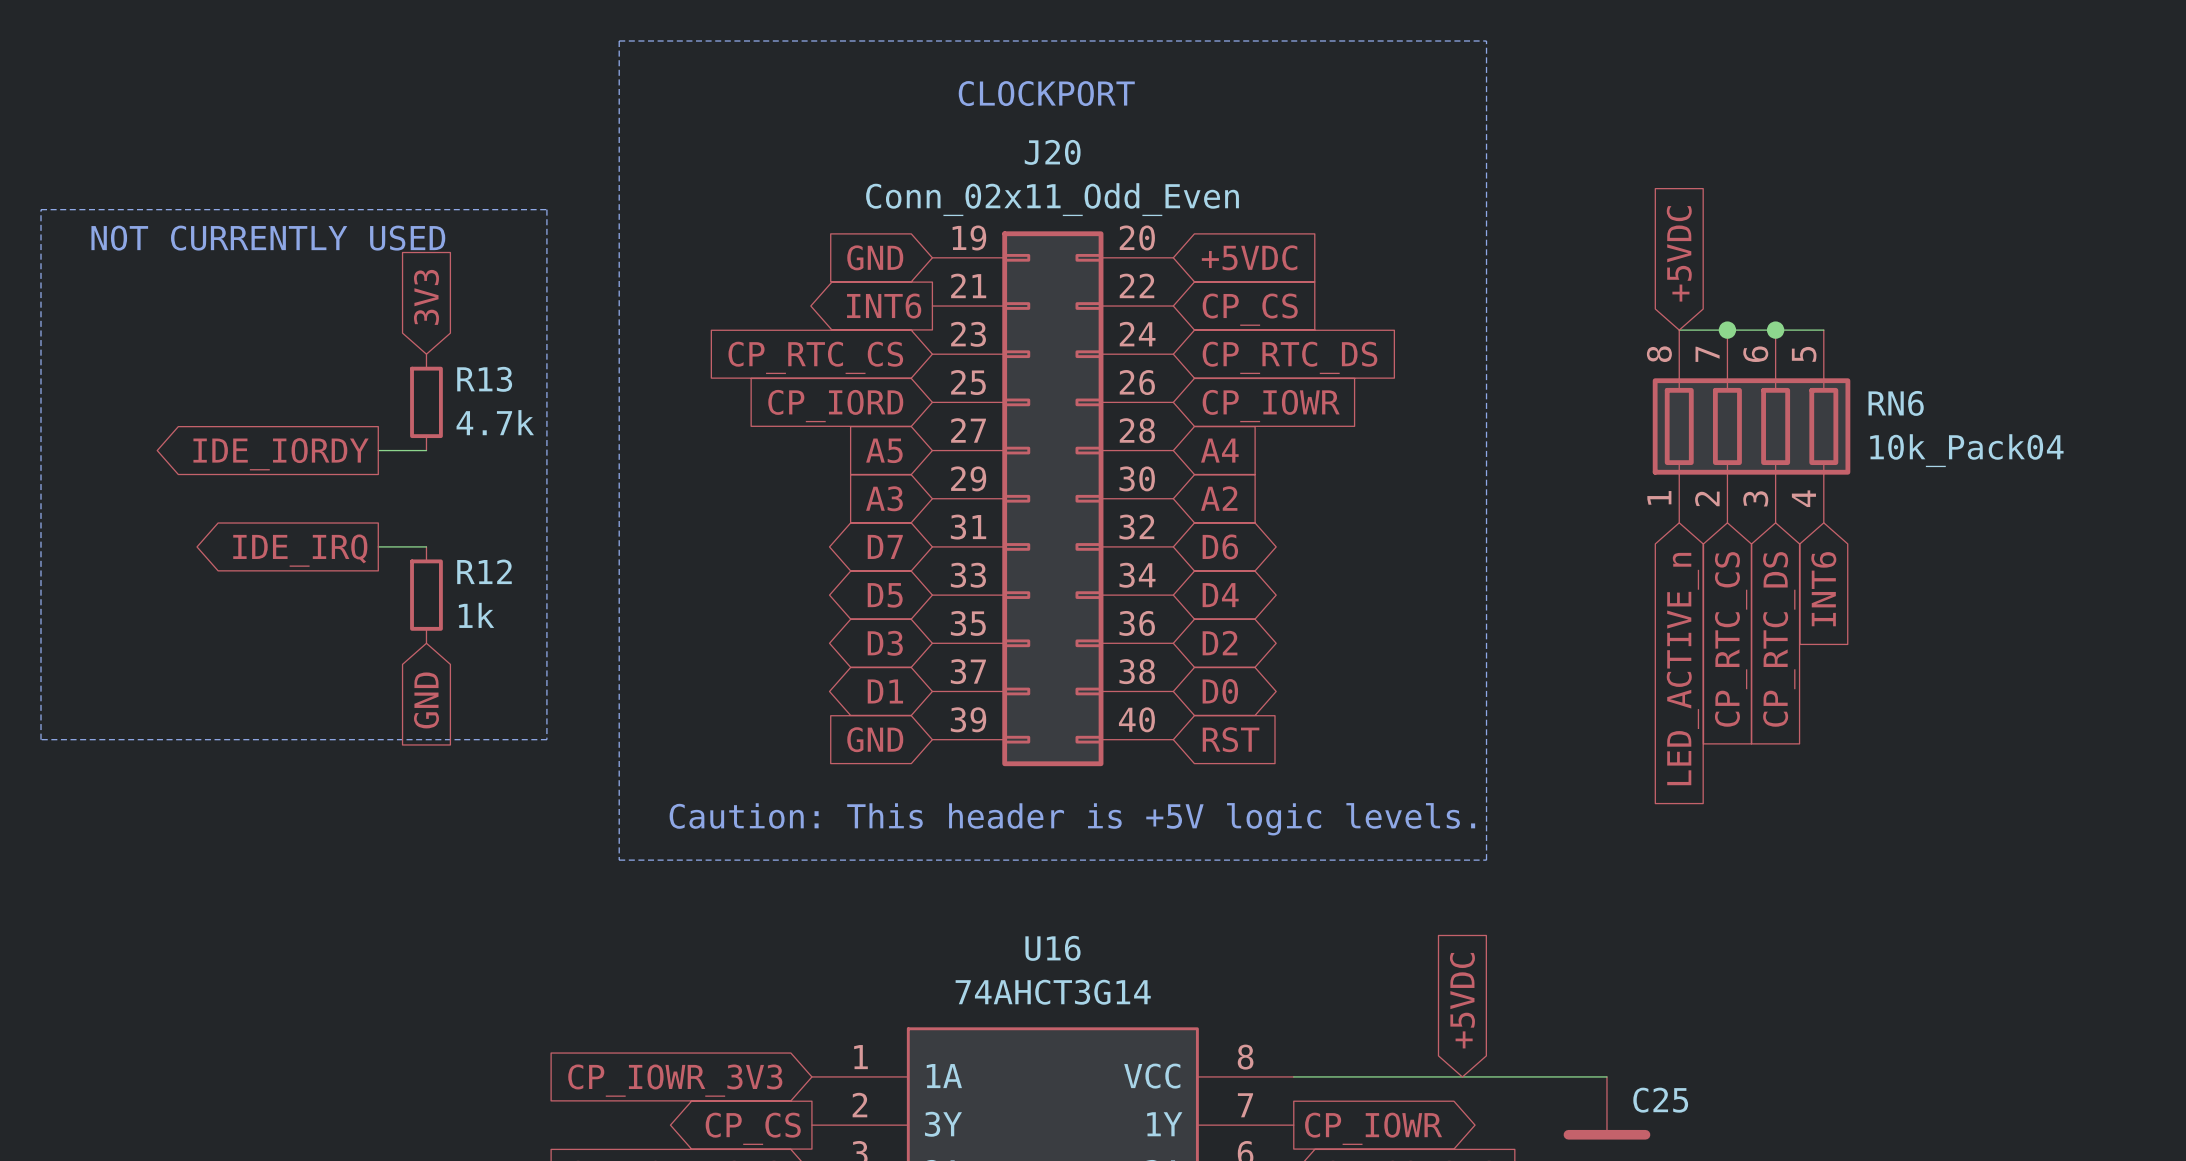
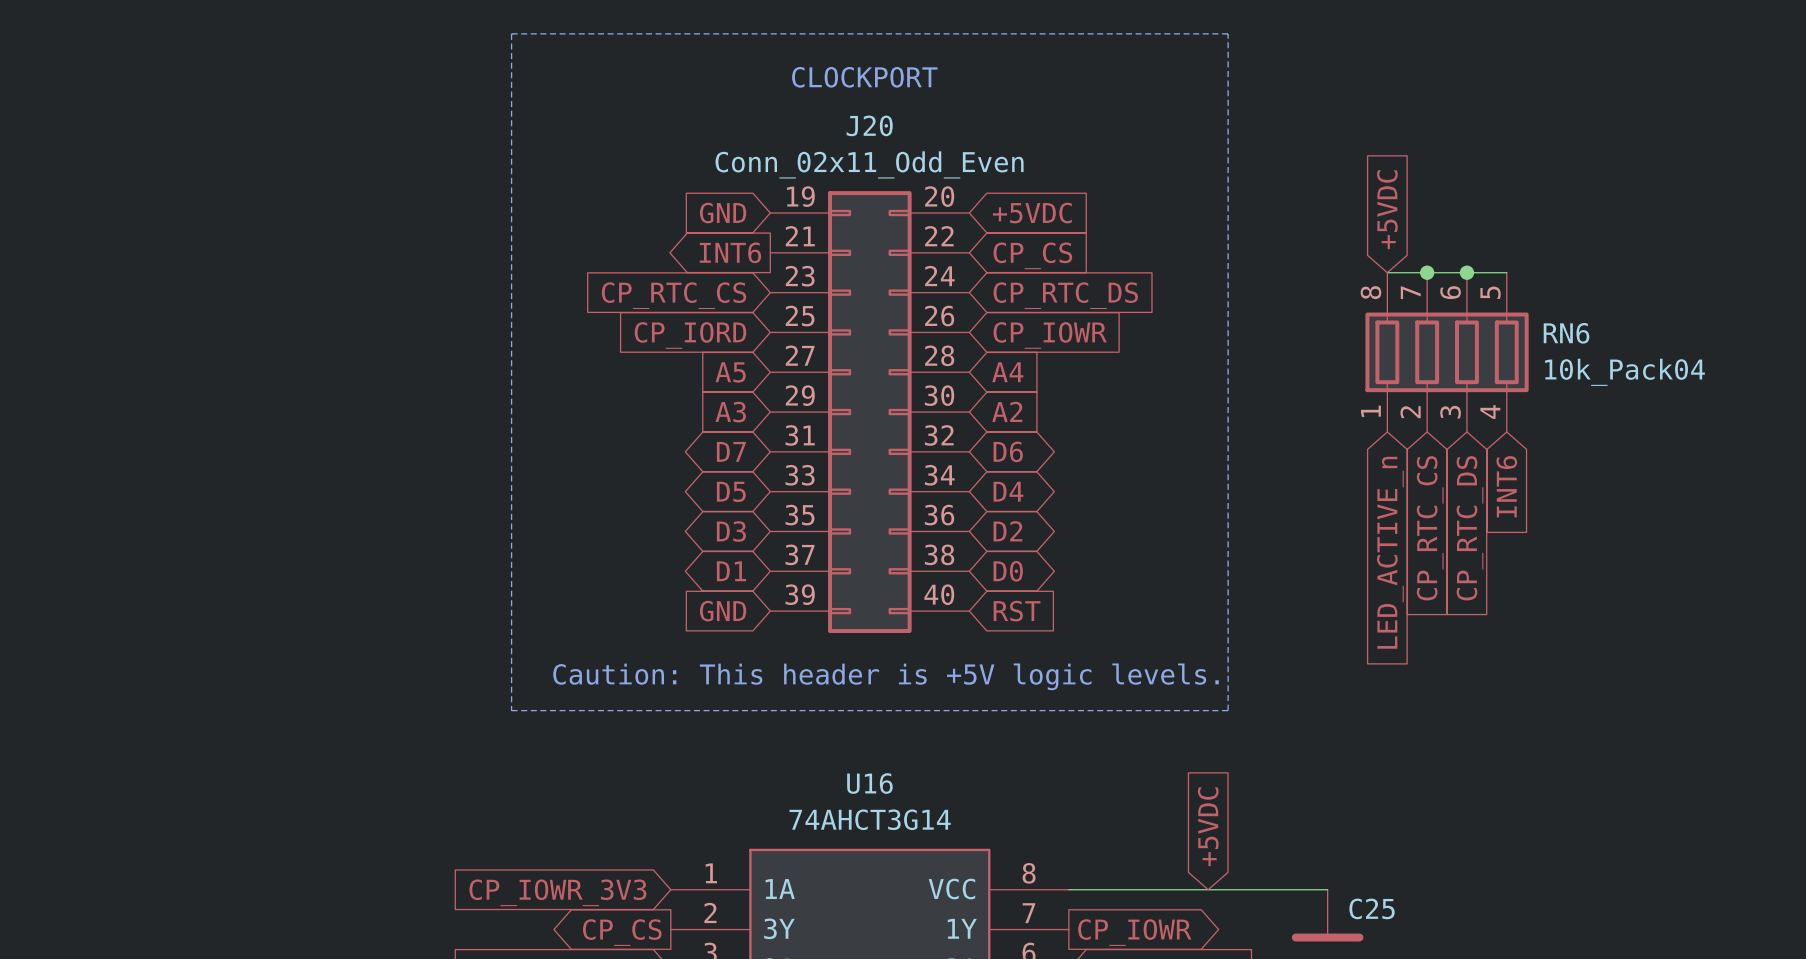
line: (41, 209) (546, 209) (546, 739) (41, 739) (41, 209) -> none
text: NOT CURRENTLY USED (268, 238) -> none
global label: 3V3 (426, 297) -> none
R13: 4.7k (426, 402) -> none
wire: (378, 450) (426, 450) -> none
global label: IDE_IORDY (281, 454) -> none
wire: (378, 546) (426, 546) -> none
global label: IDE_IRQ (300, 550) -> none
R12: 1k (426, 595) -> none
global label: GND (426, 700) -> none

